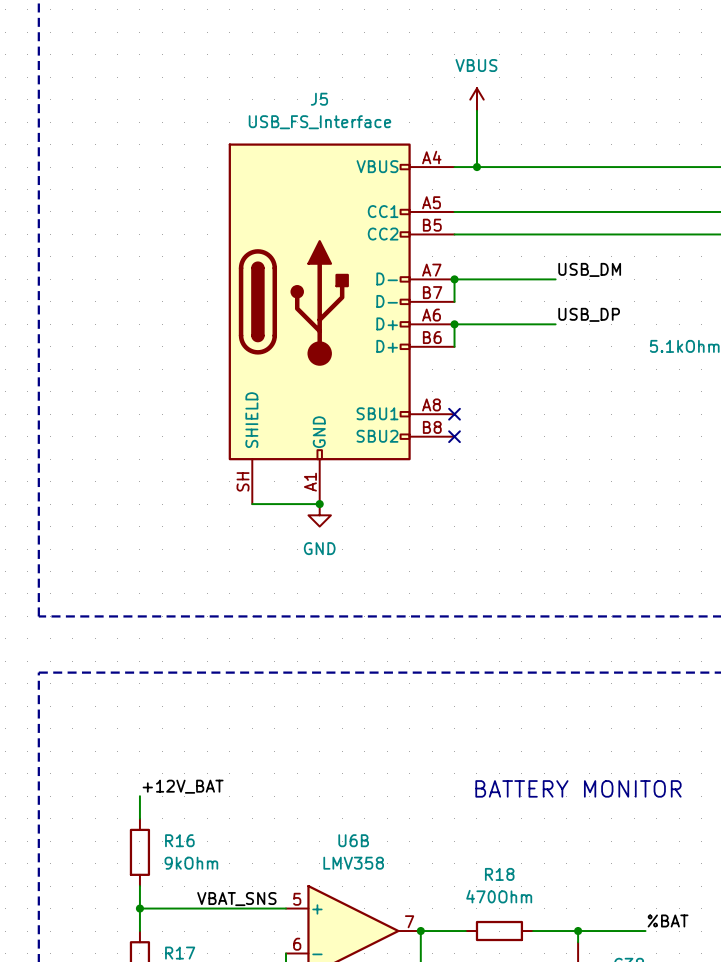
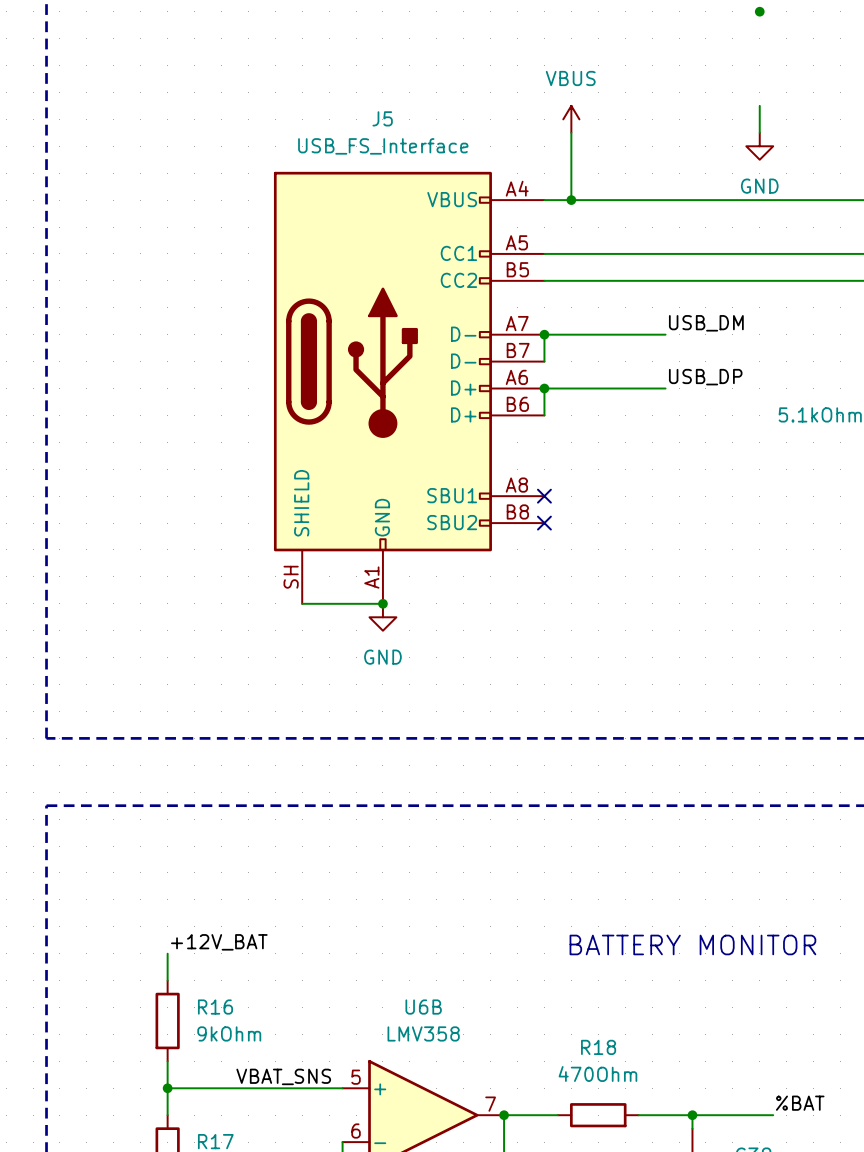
junction: none -> (759, 11)
wire: none -> (759, 105) (759, 132)
power symbol: none -> GND (759, 146)

